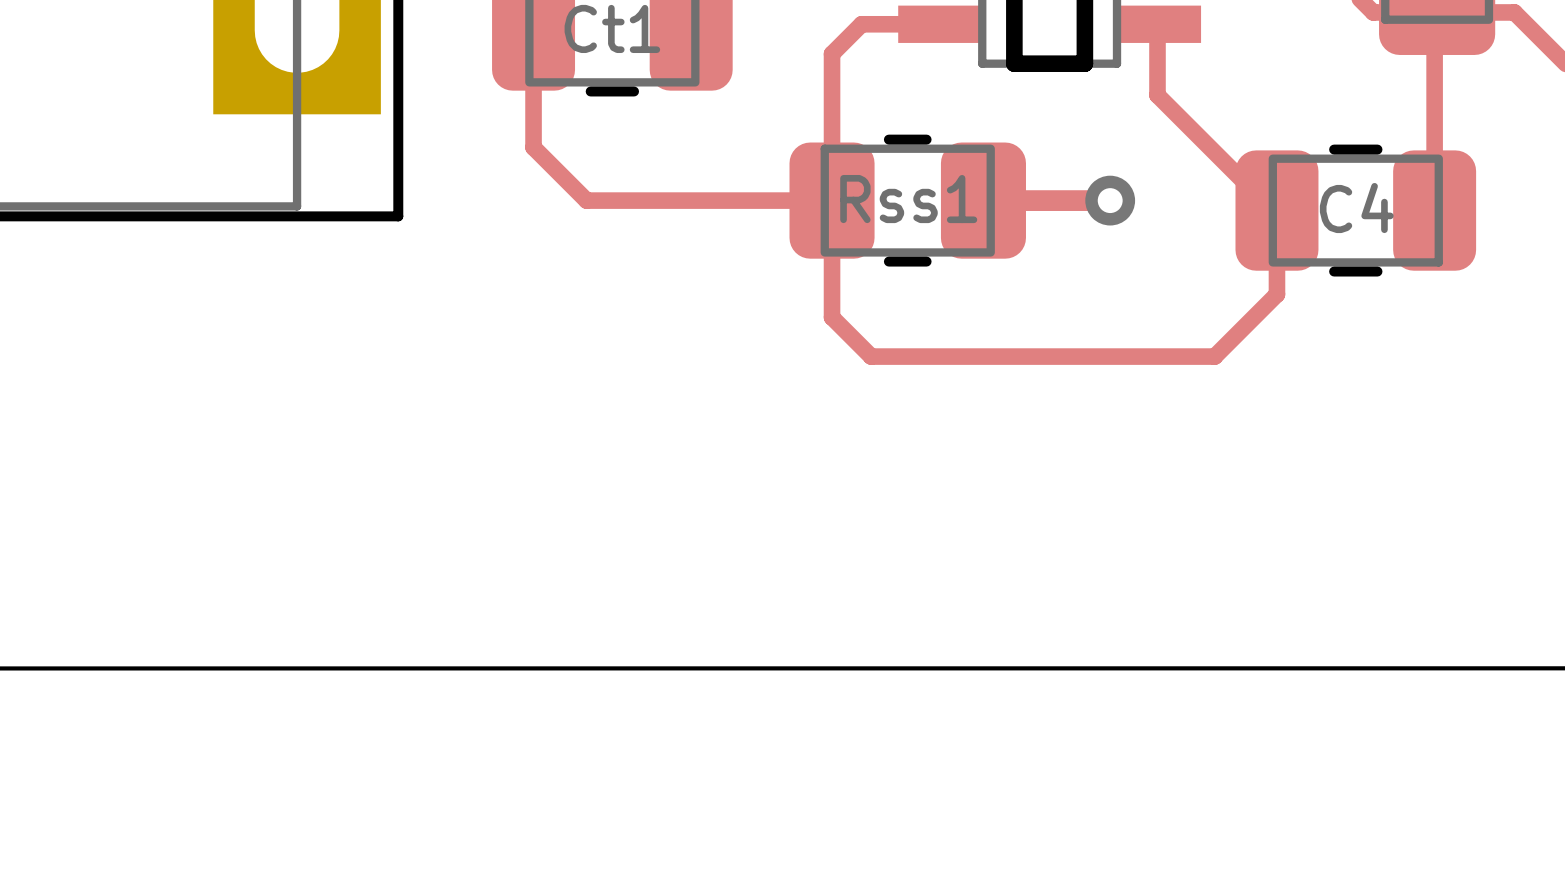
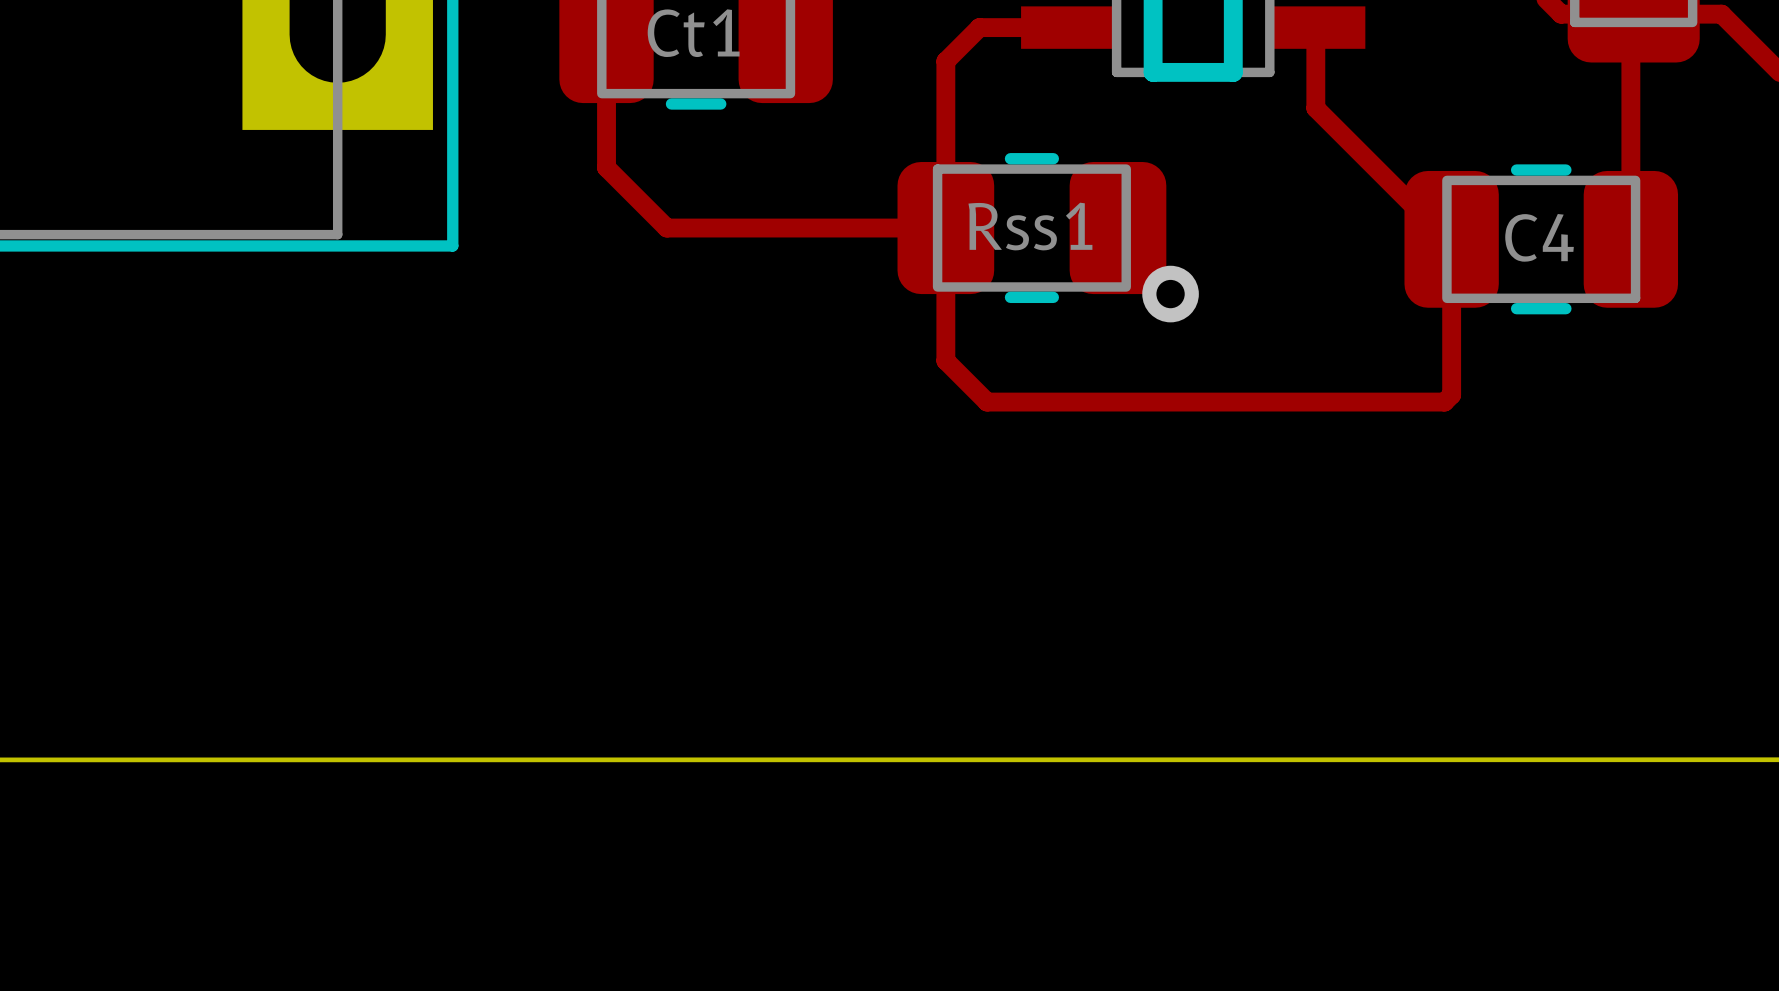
top track: (983, 200) (1110, 200) -> none
via position: (1110, 200) -> (1170, 294)
top track: (1276, 294) (1214, 356) (871, 356) (868, 353) -> (1451, 334) (1451, 394) (1444, 402) (987, 402)

